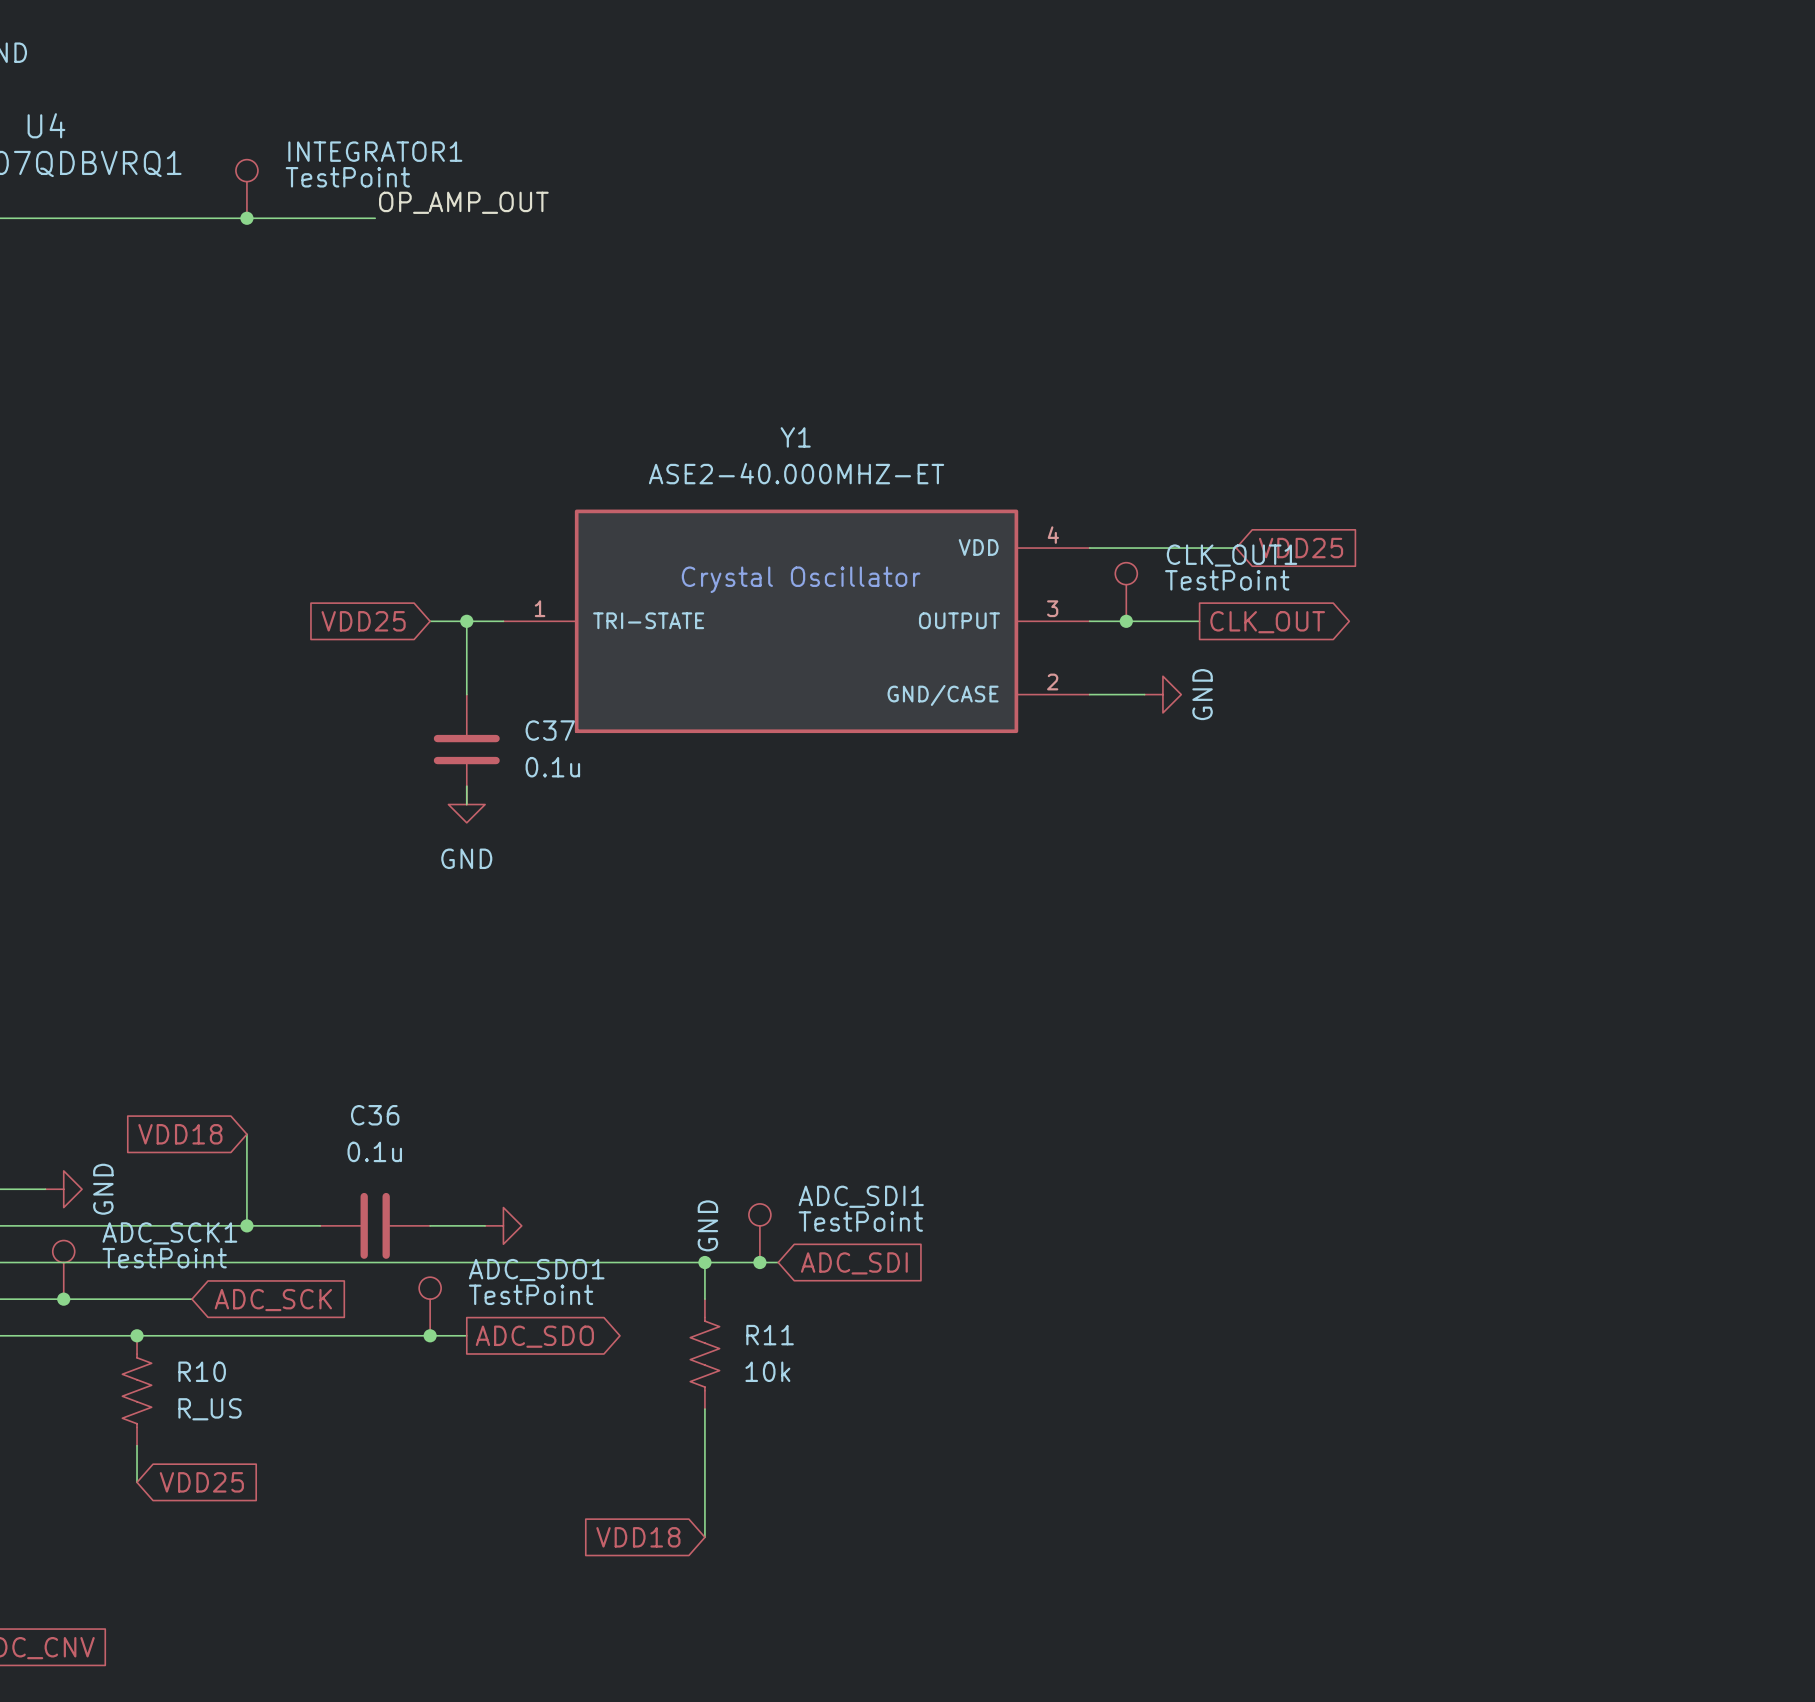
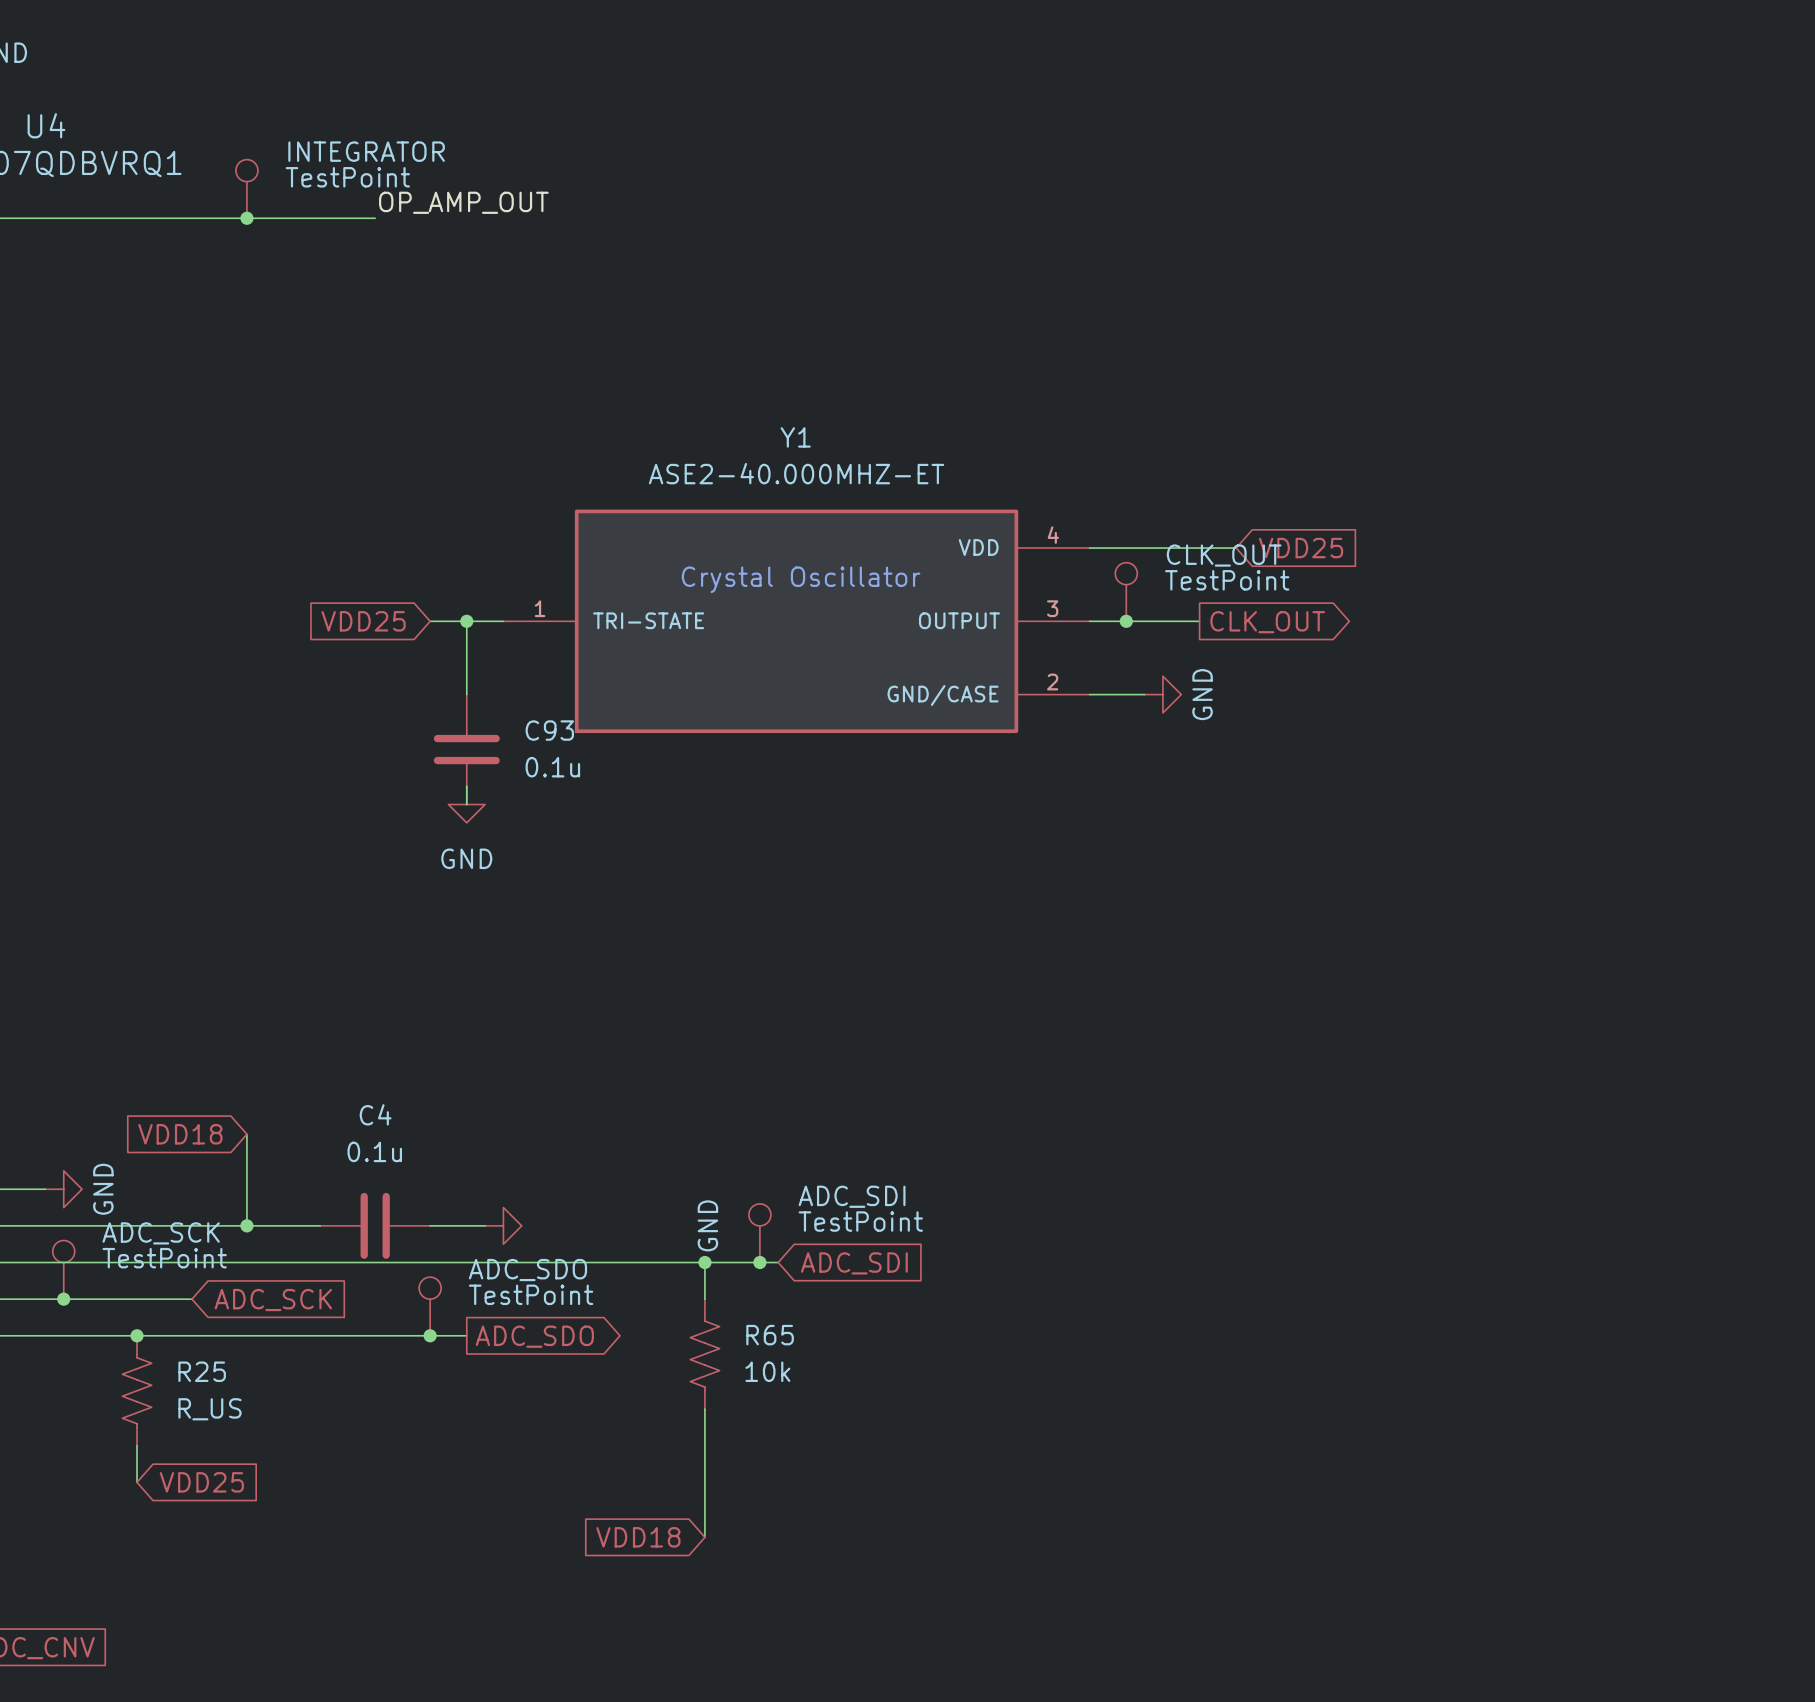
INTEGRATOR1 name: INTEGRATOR1 (375, 151) -> INTEGRATOR (366, 151)
CLK_OUT1 name: CLK_OUT1 (1232, 555) -> CLK_OUT (1224, 555)
C37 name: C37 (550, 730) -> C93 (549, 730)
C36 name: C36 (375, 1115) -> C4 (375, 1114)
ADC_SDI1 name: ADC_SDI1 (861, 1196) -> ADC_SDI (852, 1196)
ADC_SCK1 name: ADC_SCK1 (169, 1233) -> ADC_SCK (161, 1233)
ADC_SDO1 name: ADC_SDO1 (536, 1270) -> ADC_SDO (527, 1270)
R11 name: R11 (770, 1335) -> R65 (770, 1335)
R10 name: R10 (202, 1371) -> R25 (202, 1371)

